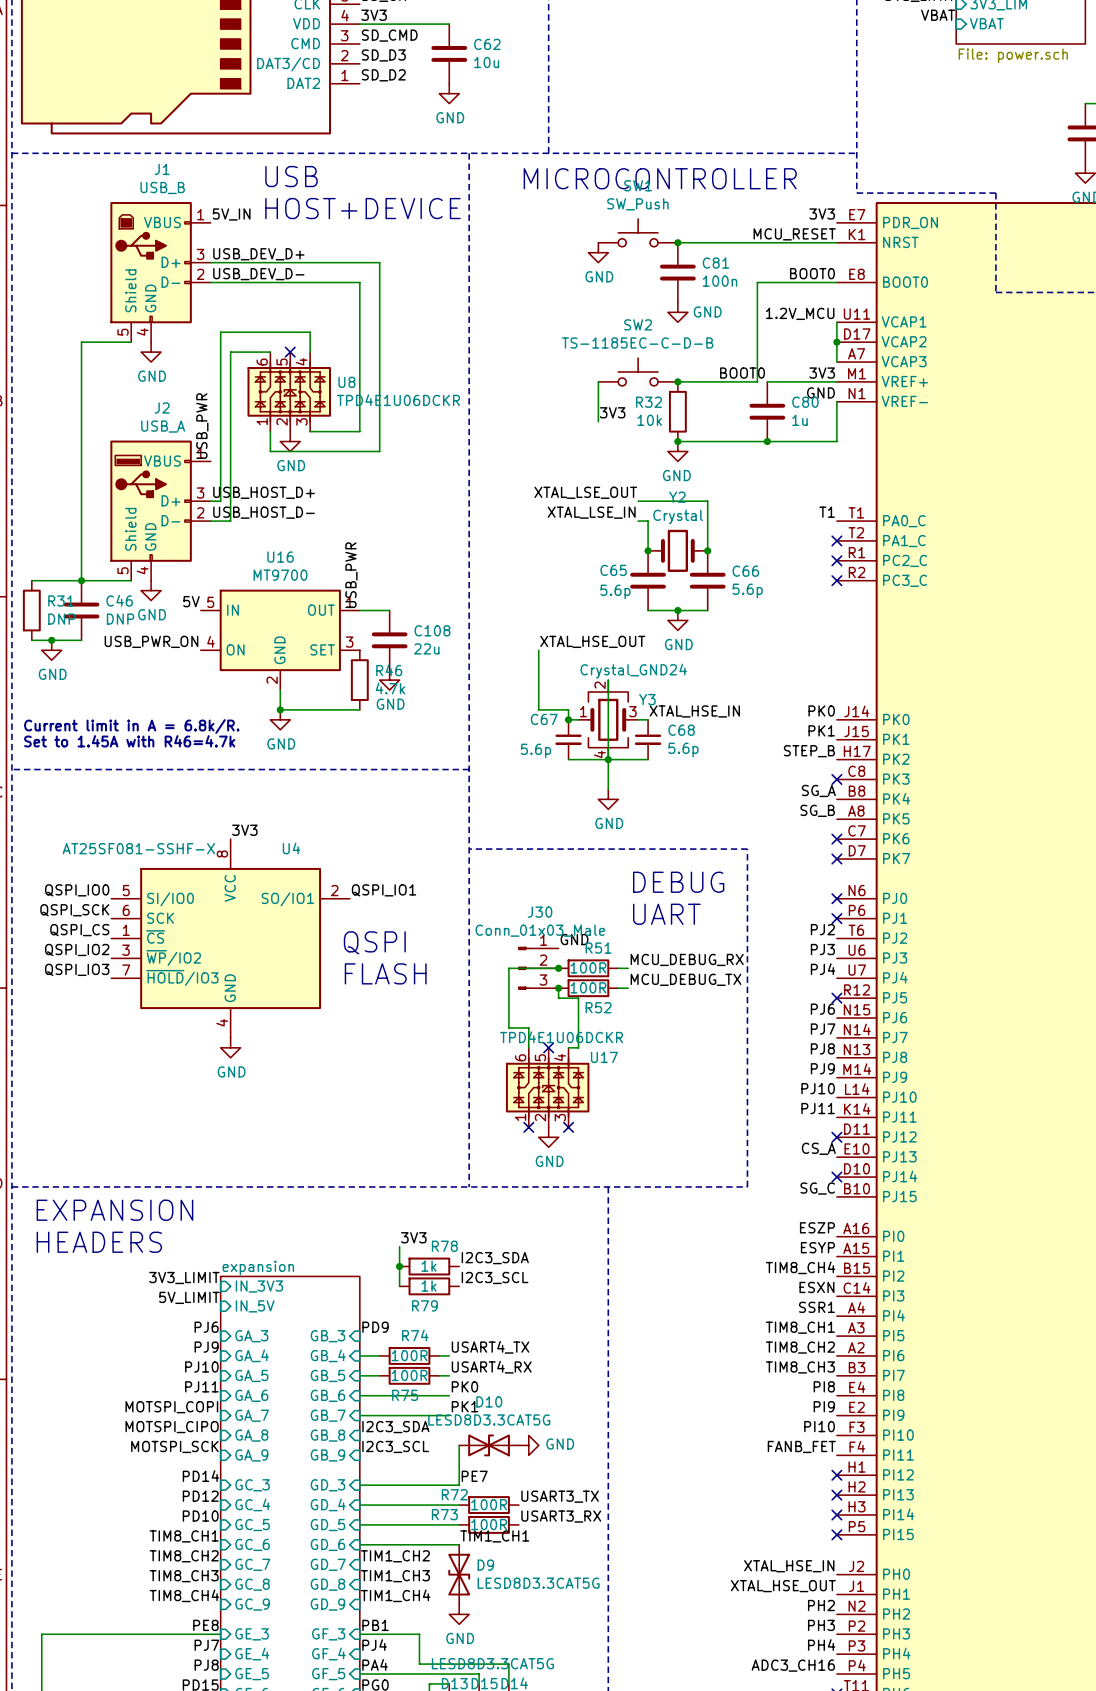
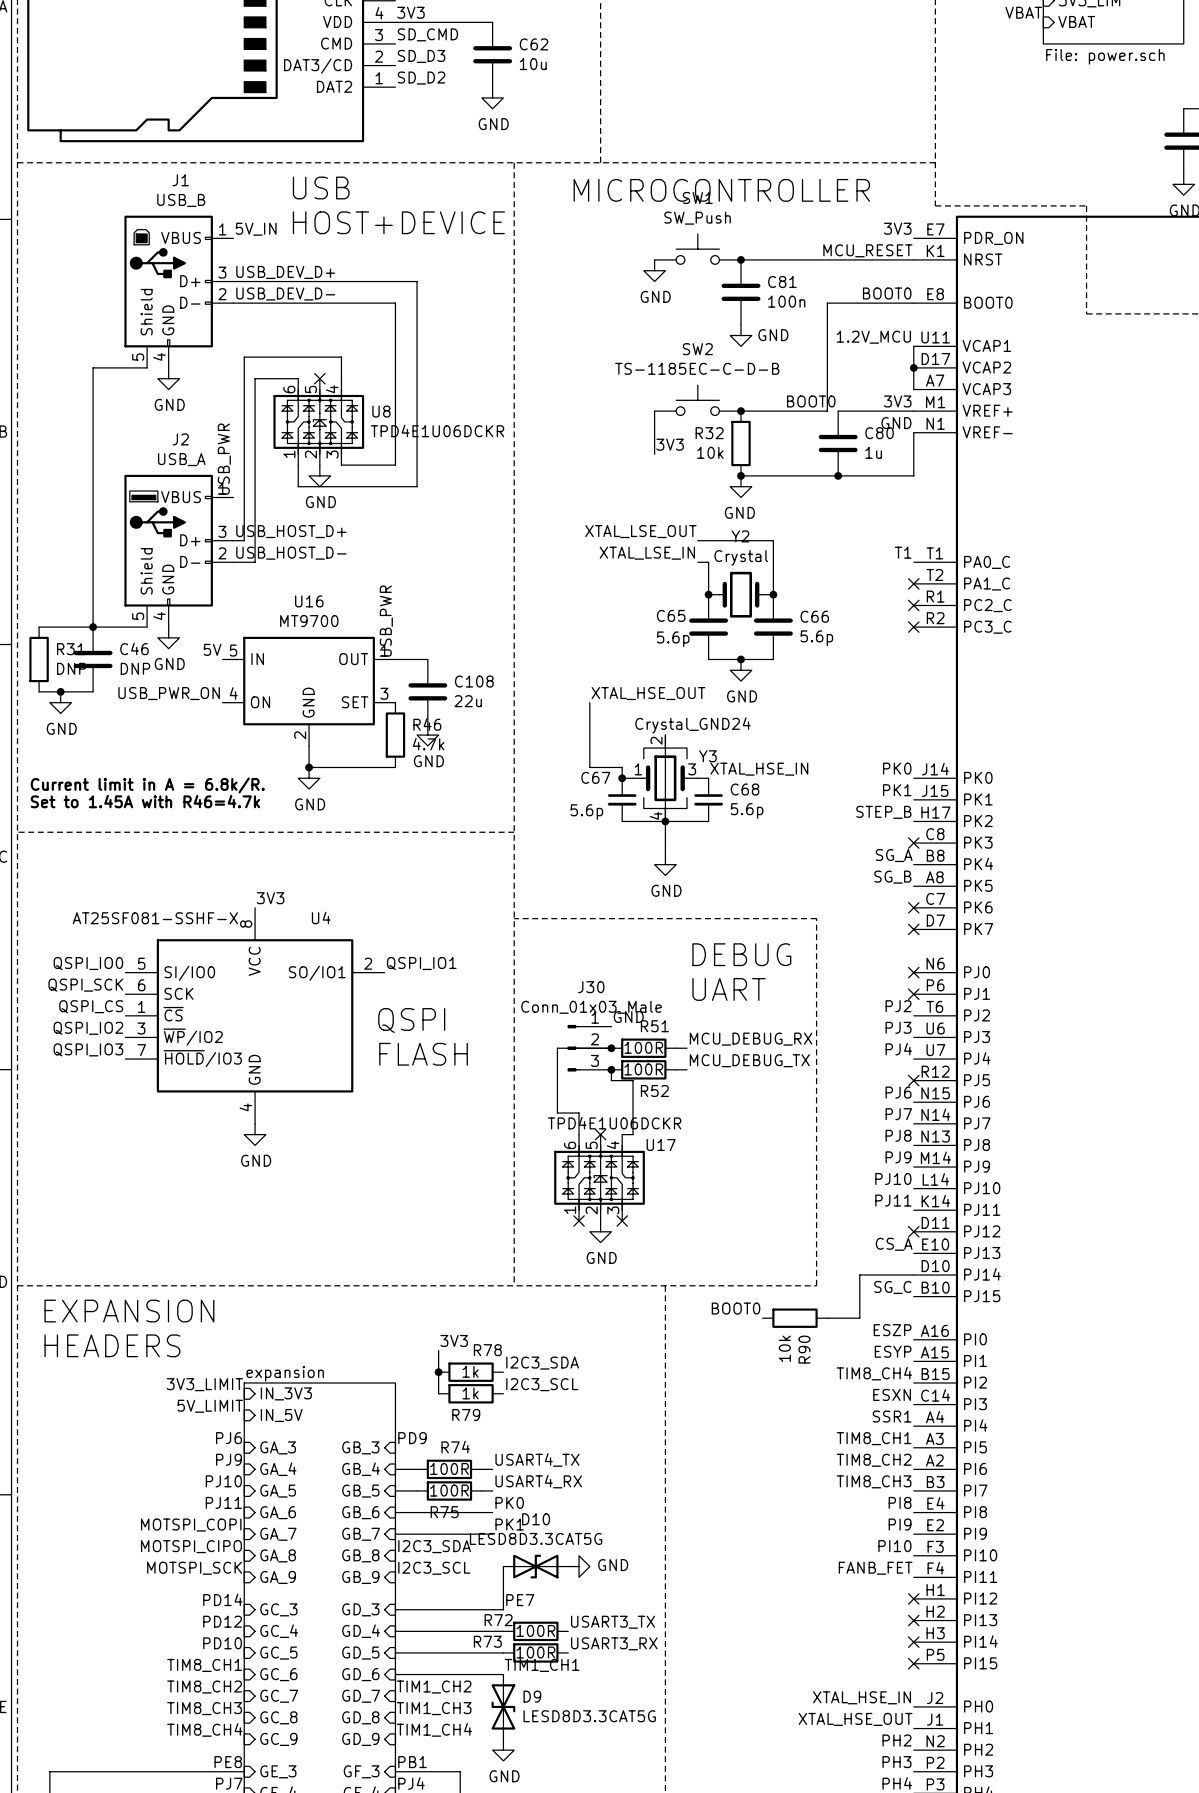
wire: none -> (913, 1275) (859, 1275) (859, 1318) (827, 1318)
no-connect mark: (836, 1177) -> none
label: none -> BOOT0 (736, 1308)
R90: none -> 10k (794, 1318)

